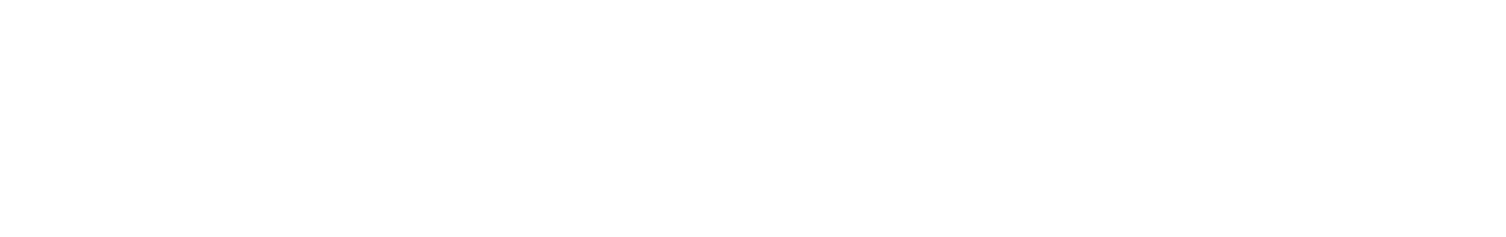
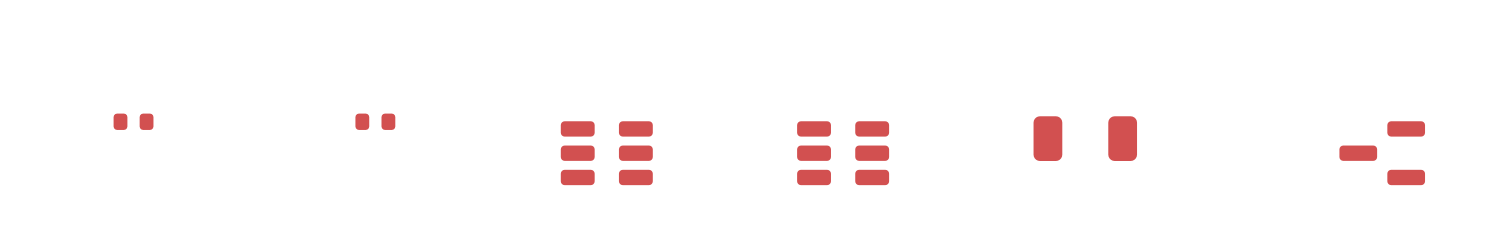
part: none -> (133, 121)
part: none -> (375, 121)
part: none -> (1085, 138)
part: none -> (606, 153)
part: none -> (843, 153)
part: none -> (1382, 153)

